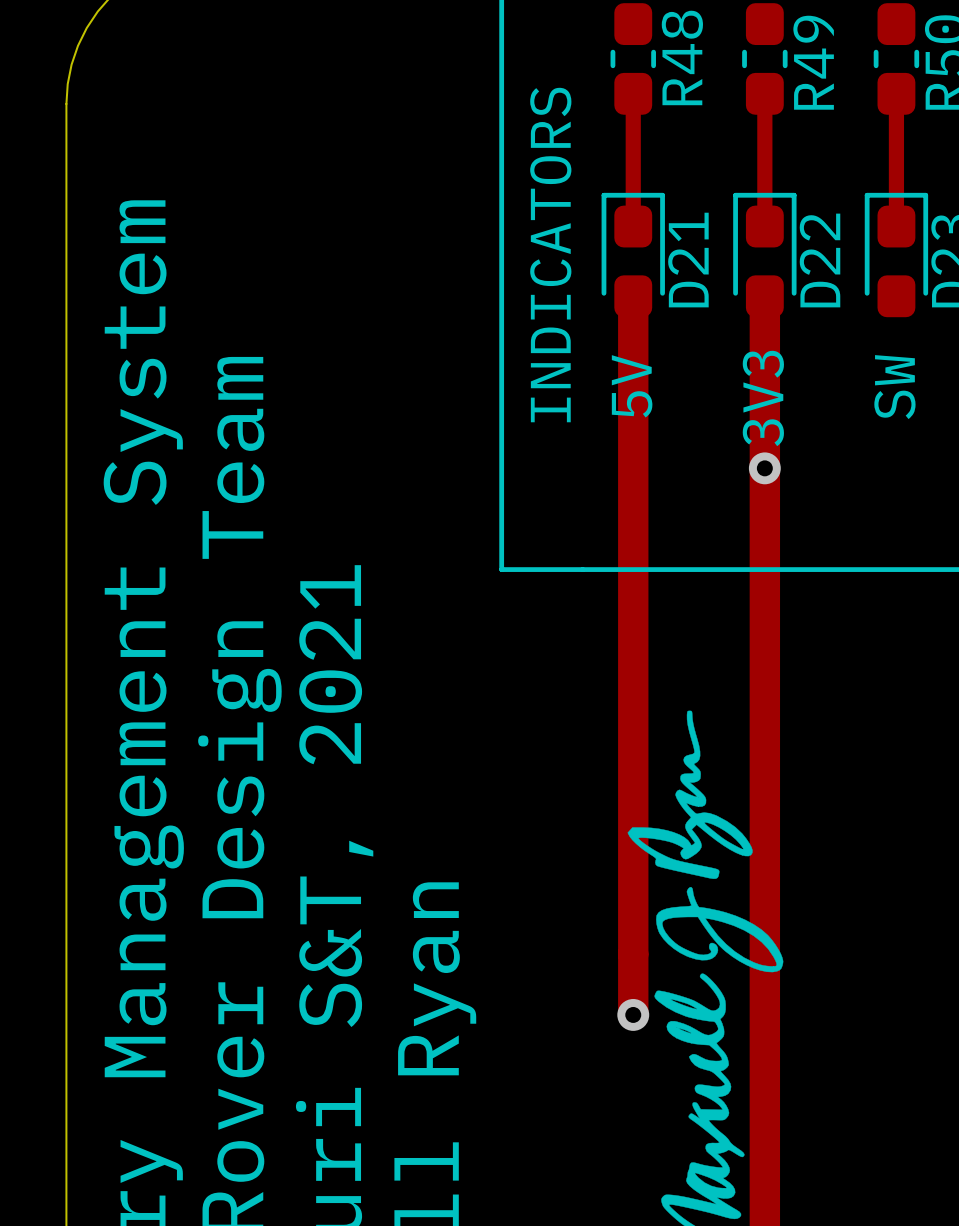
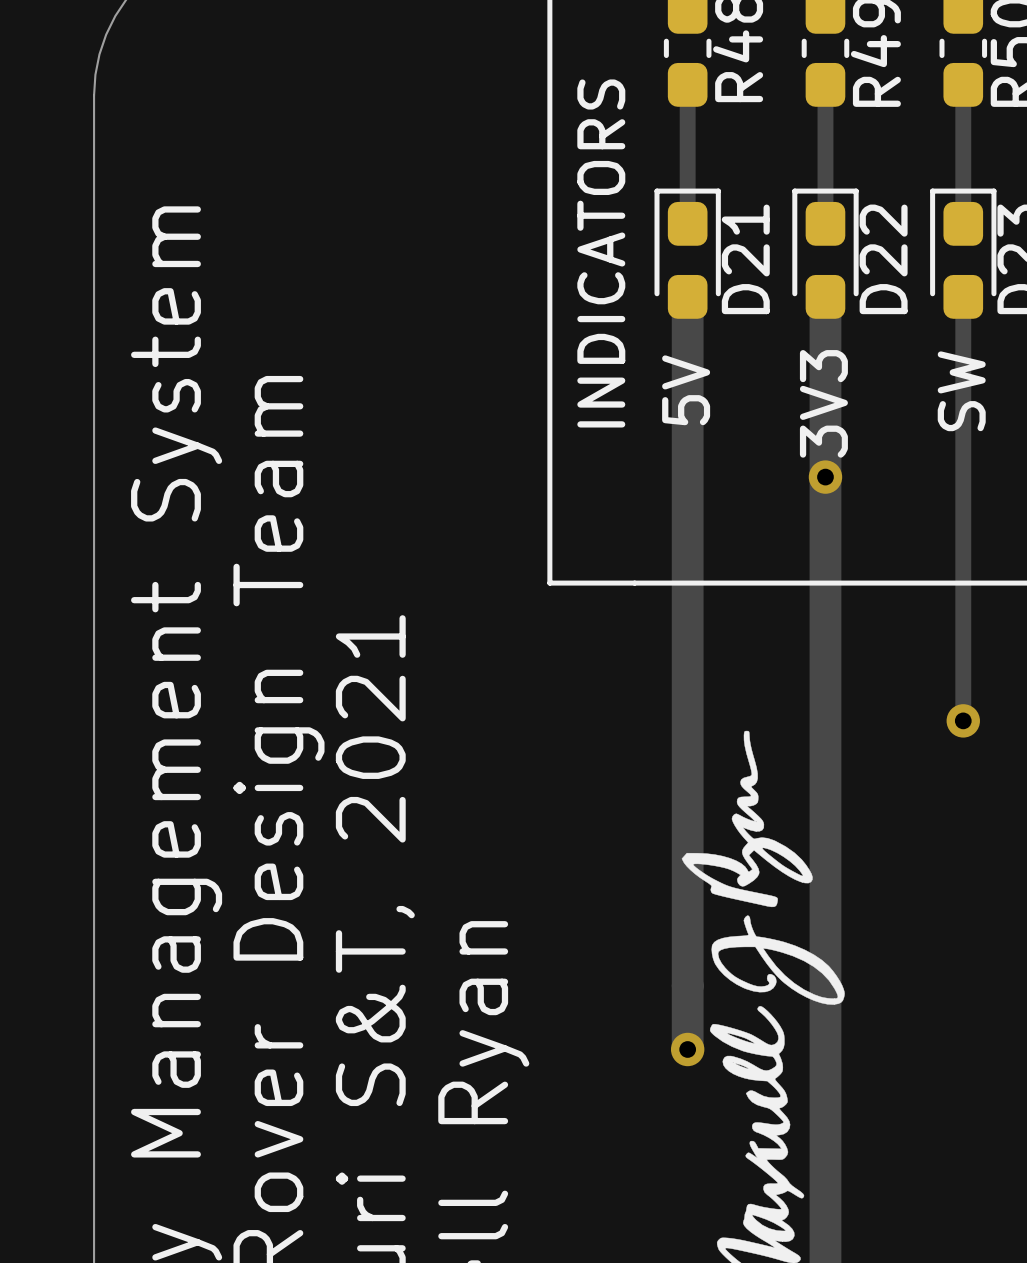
track: none -> (963, 296) (963, 720)
via: none -> (963, 720)

